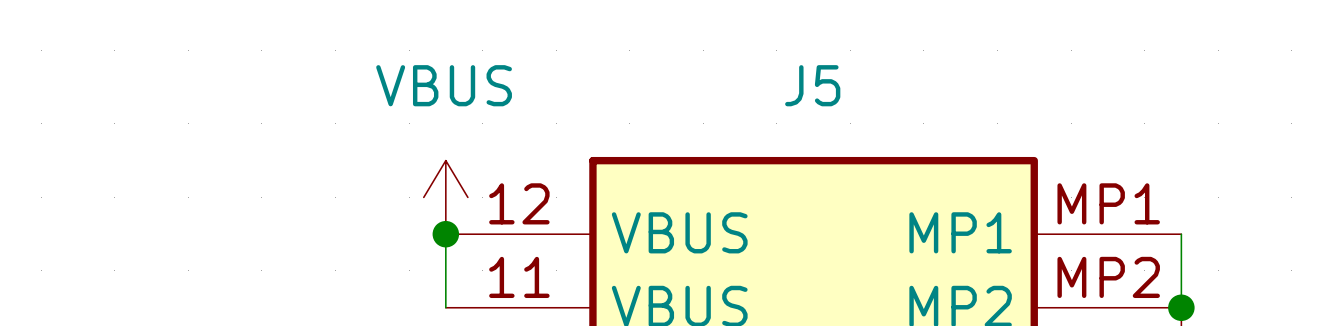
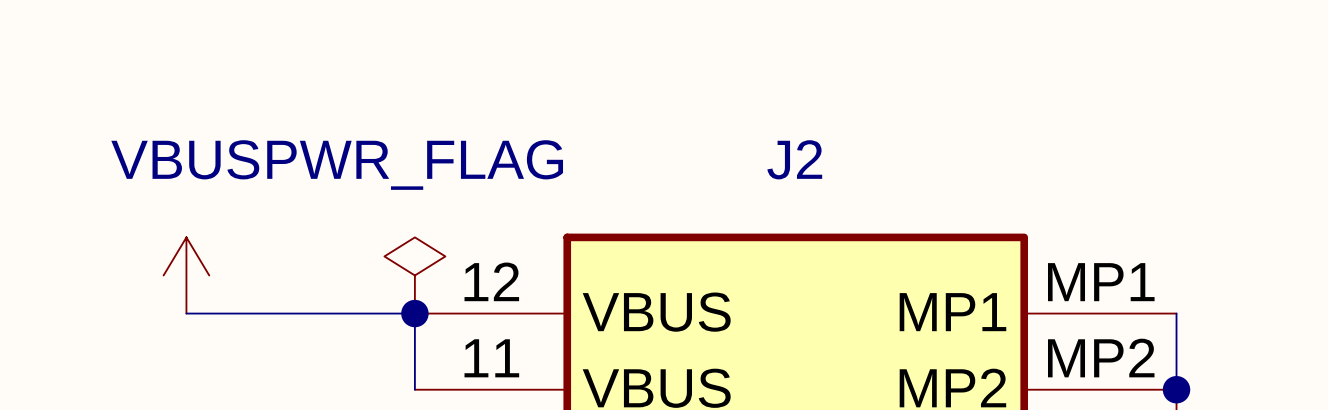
J5 name: J5 (812, 85) -> J2 (794, 159)
power symbol: none -> VBUS (186, 275)
power symbol: VBUS (445, 197) -> PWR_FLAG (414, 275)
wire: none -> (186, 313) (414, 313)

